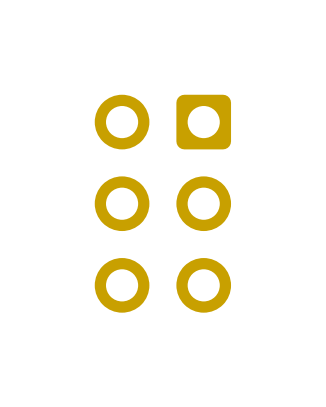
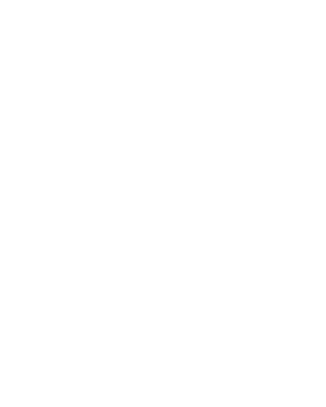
part: (162, 203) -> none

